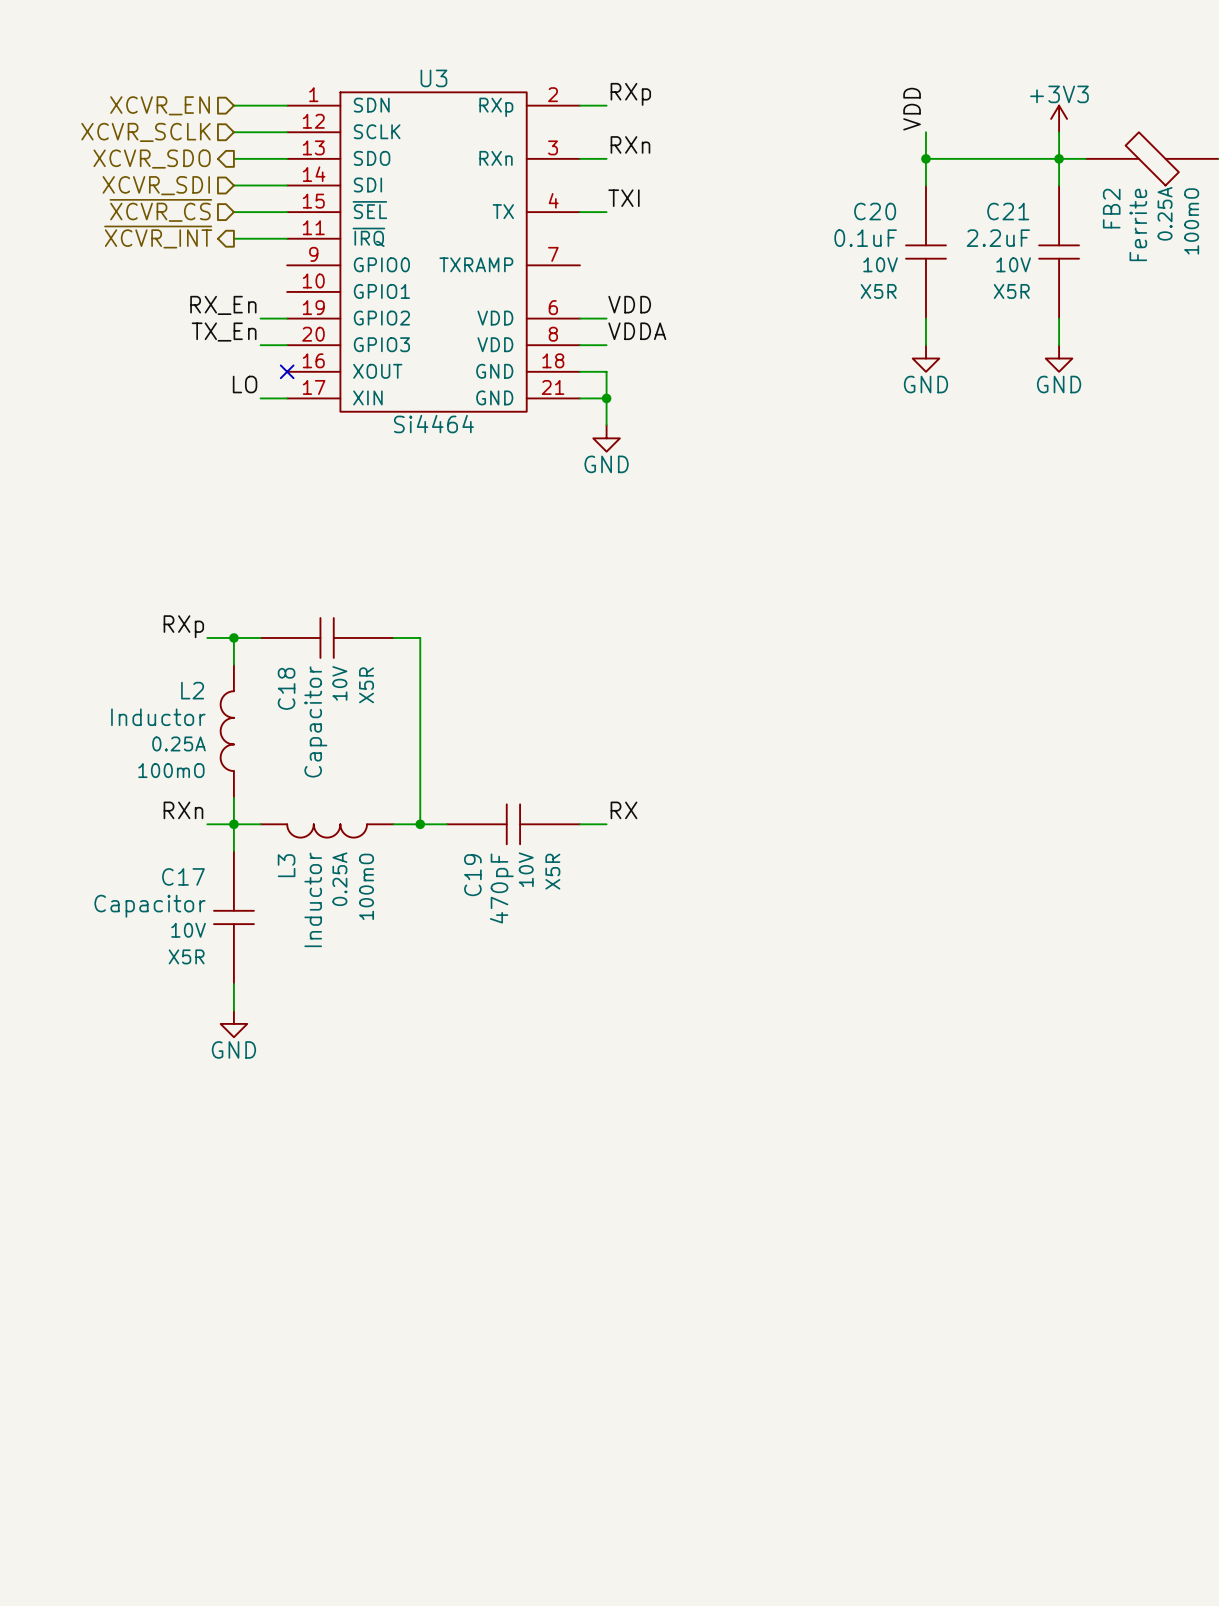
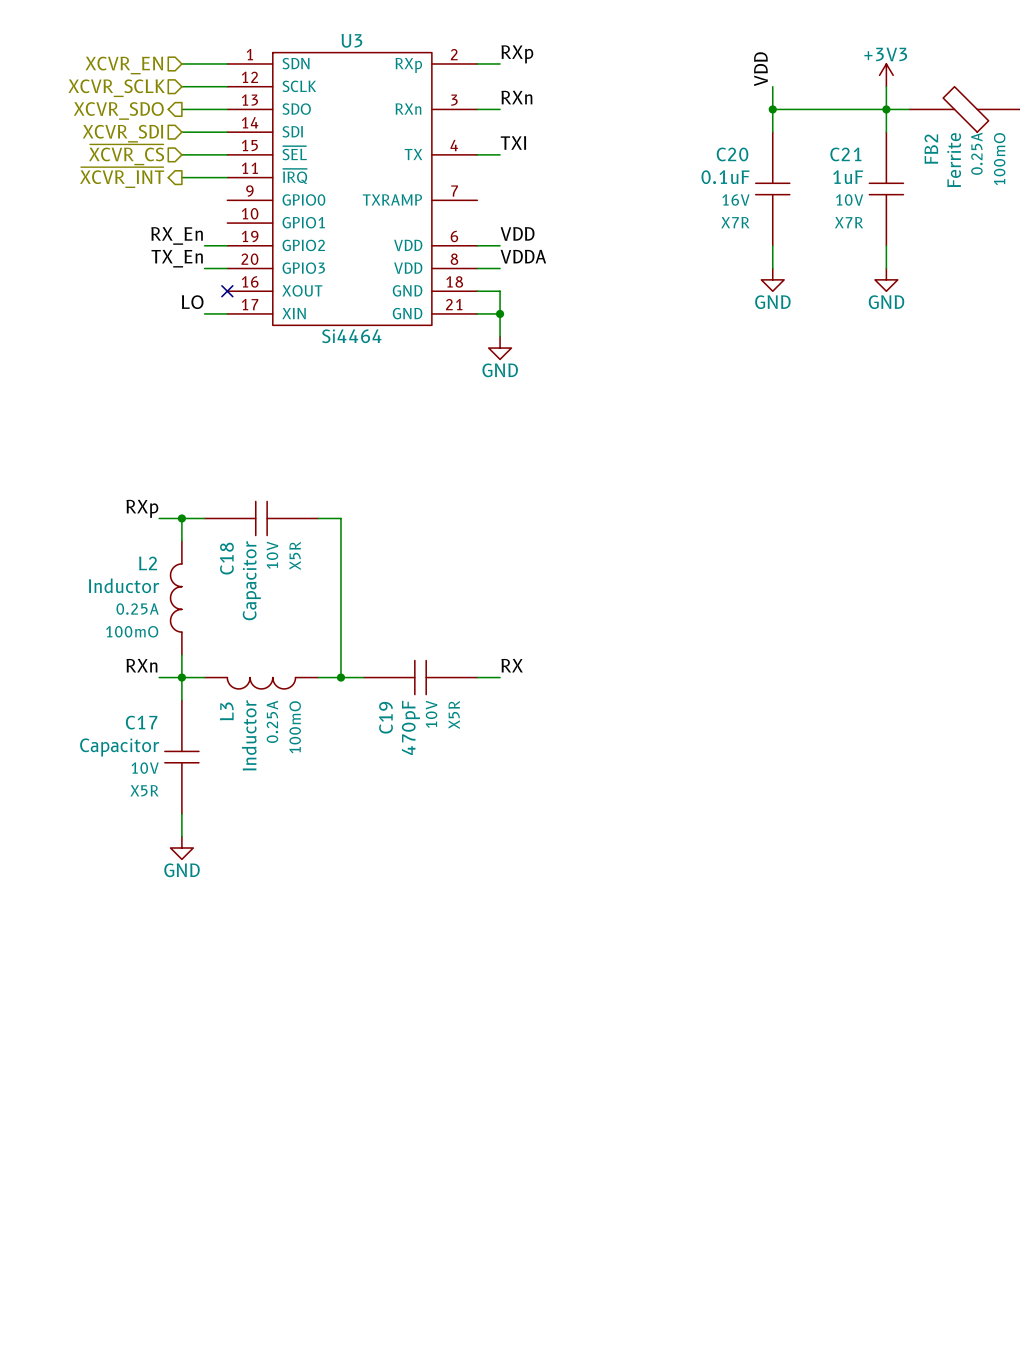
C21 value: 2.2uF (998, 238) -> 1uF (848, 177)
C20 text: 10V (880, 264) -> 16V (735, 199)
C20 text: X5R (878, 291) -> X7R (735, 222)
C21 text: X5R (1011, 291) -> X7R (849, 222)

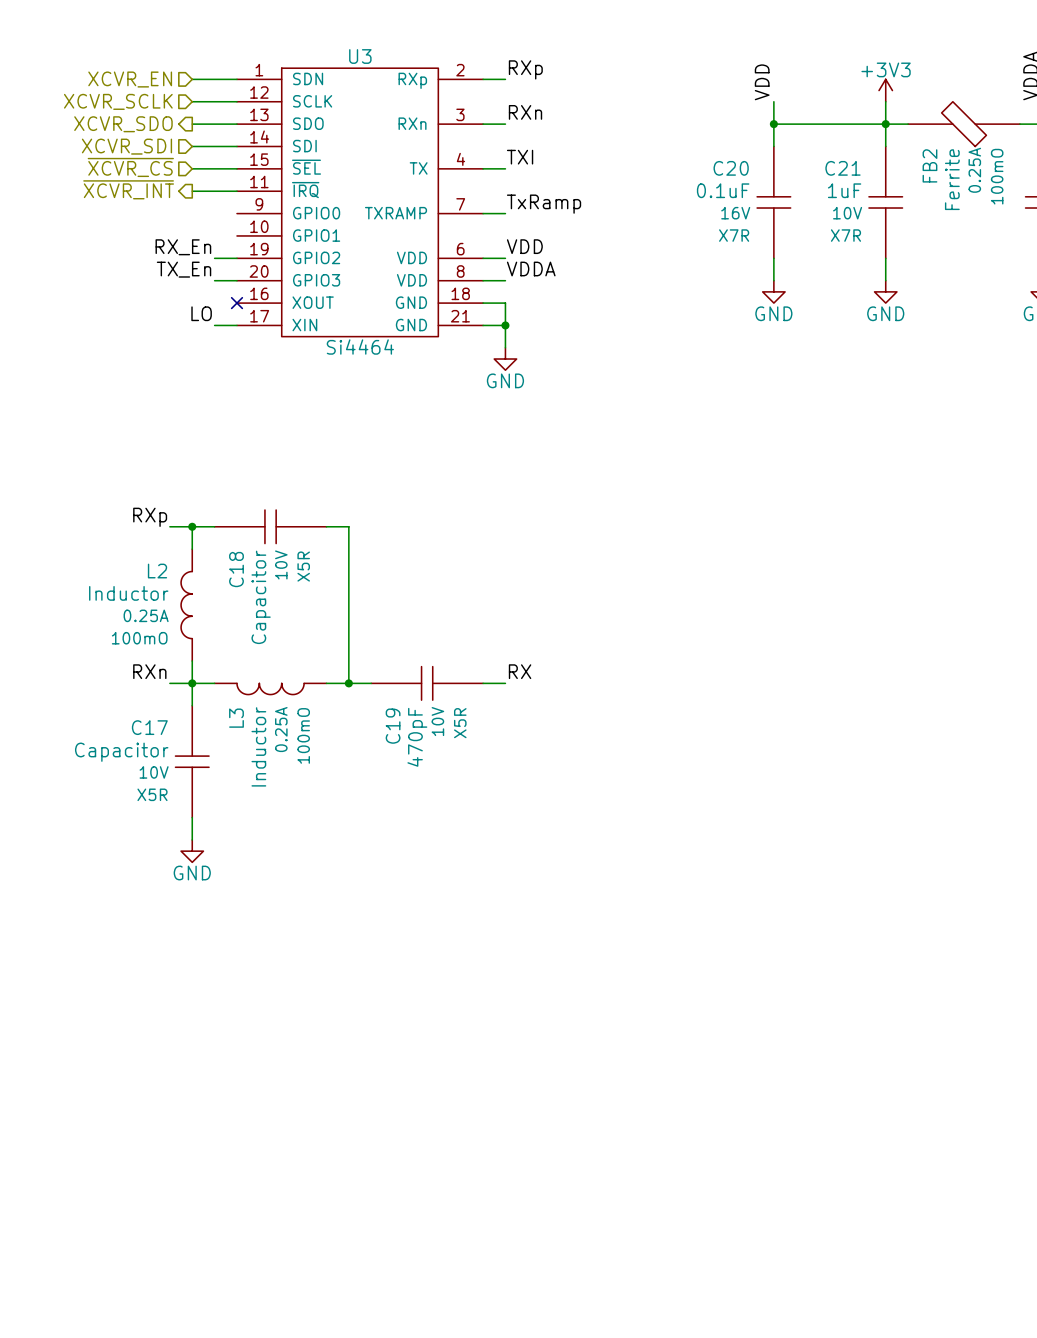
label: none -> TxRamp (544, 204)
wire: none -> (483, 213) (505, 213)

